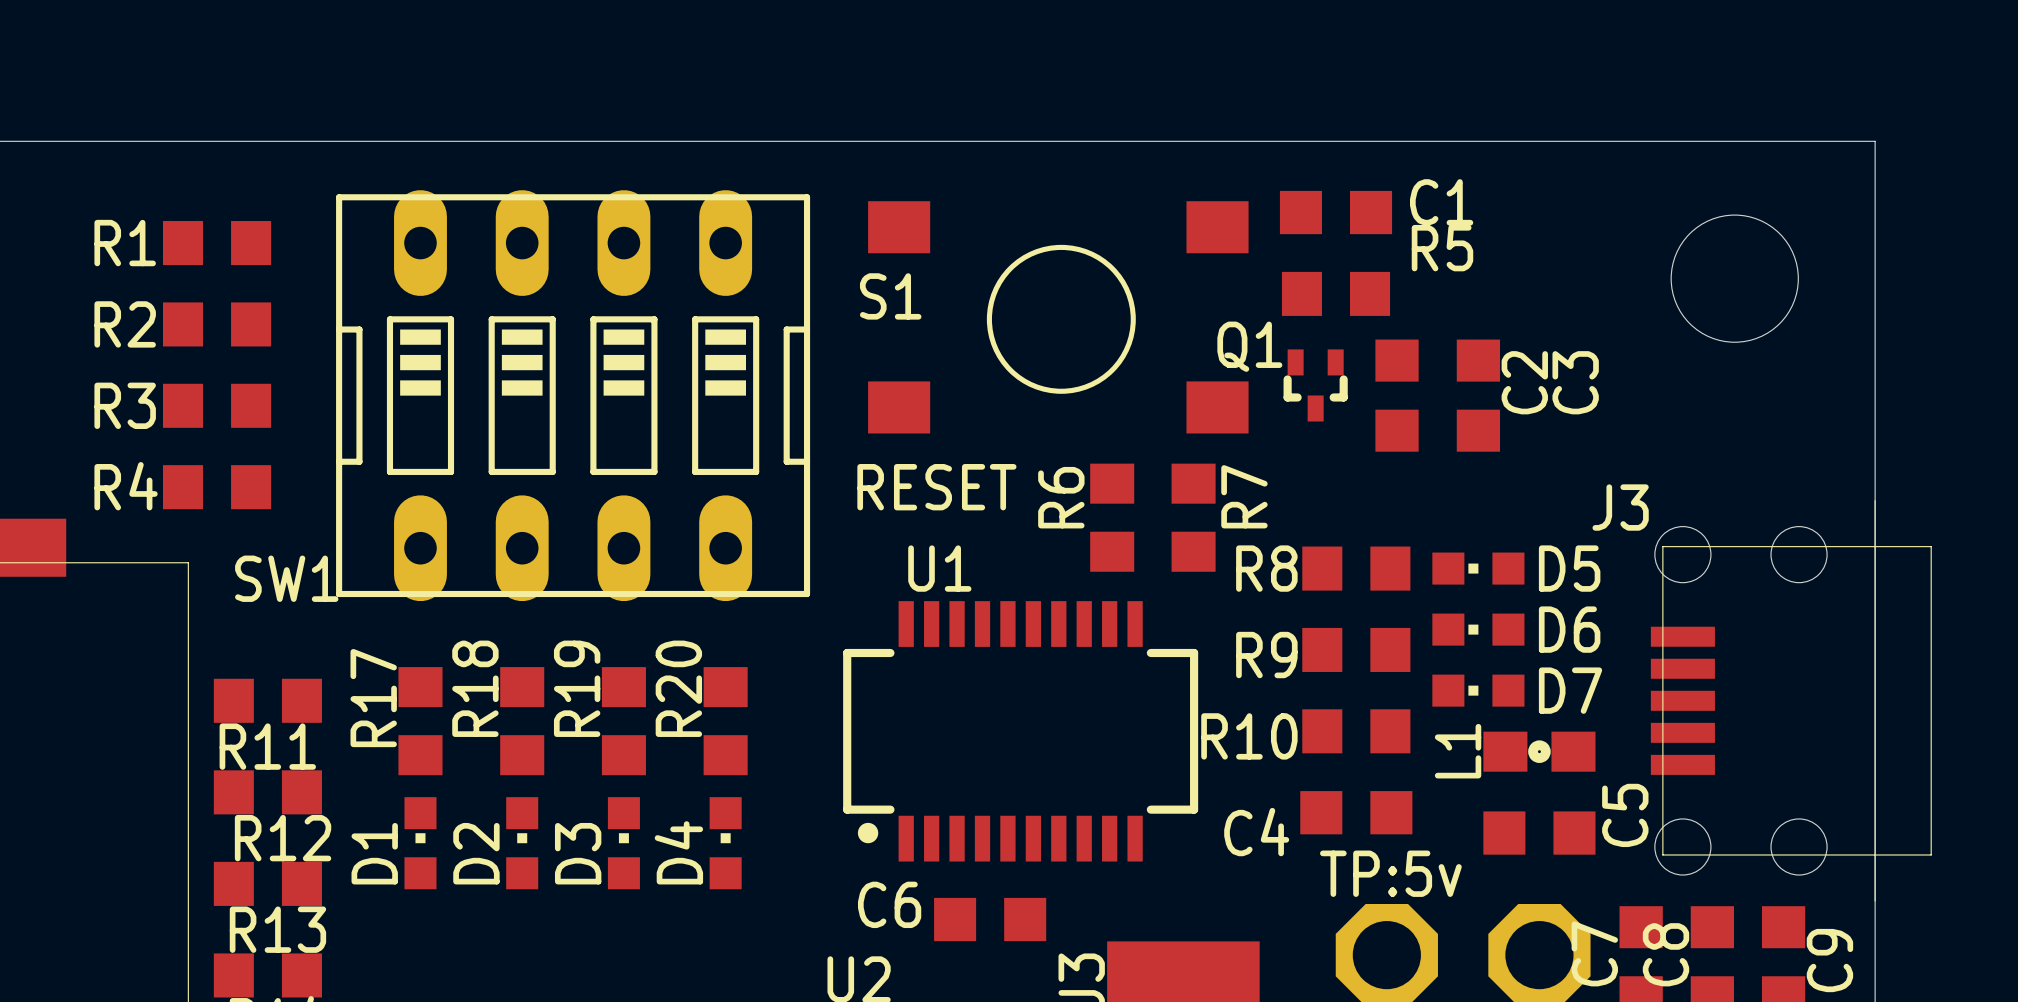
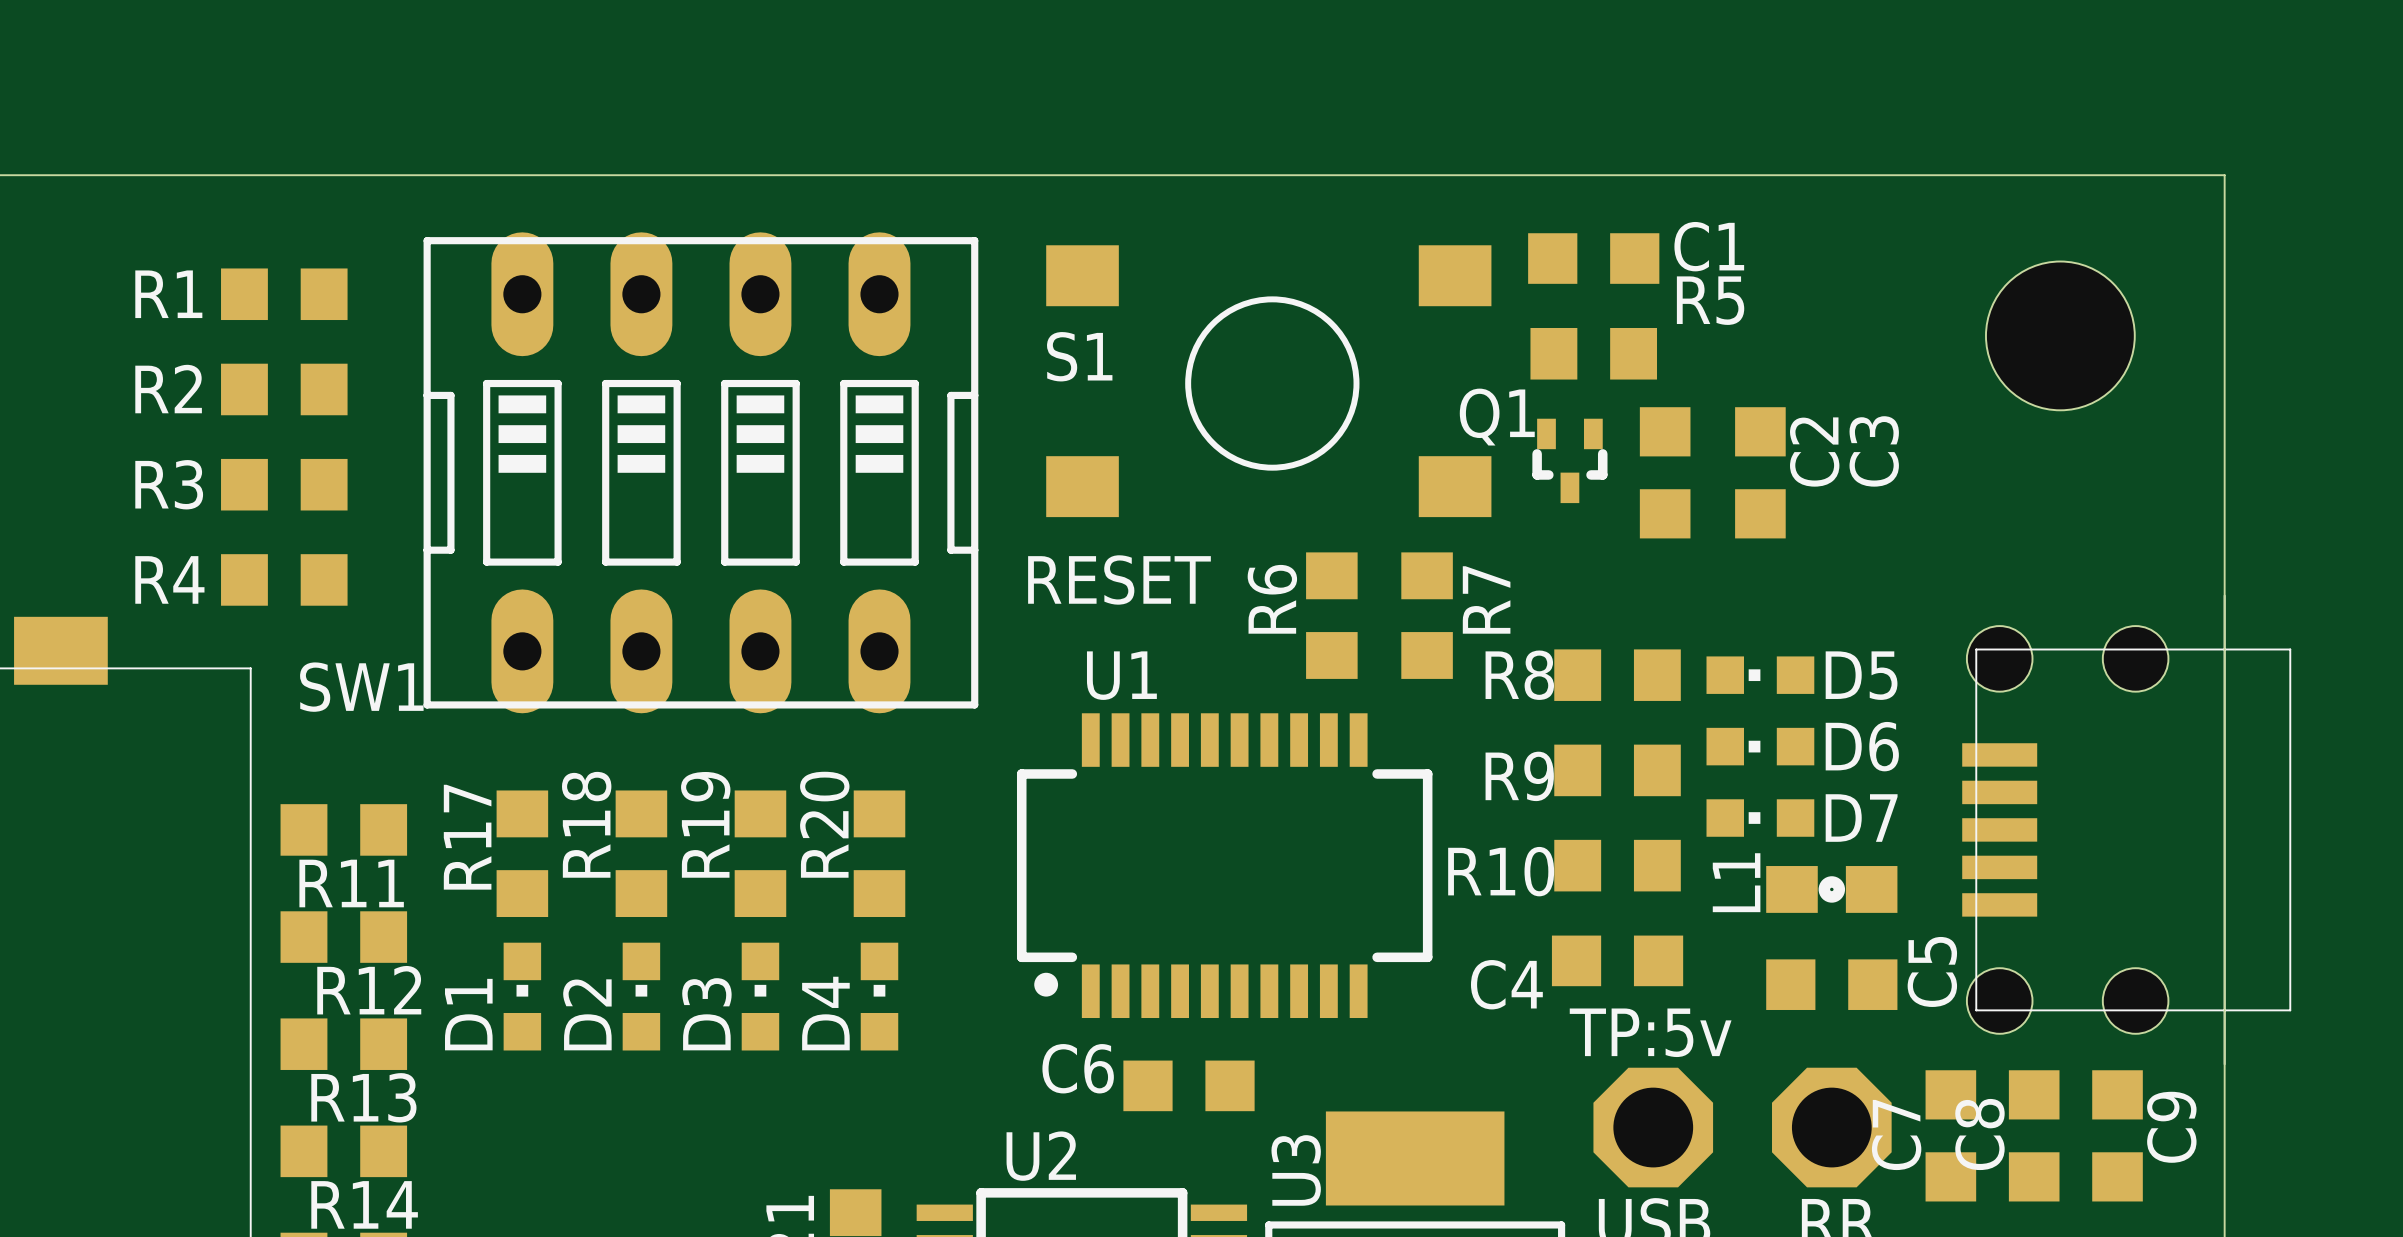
J3 name: J3 (1620, 507) -> none

